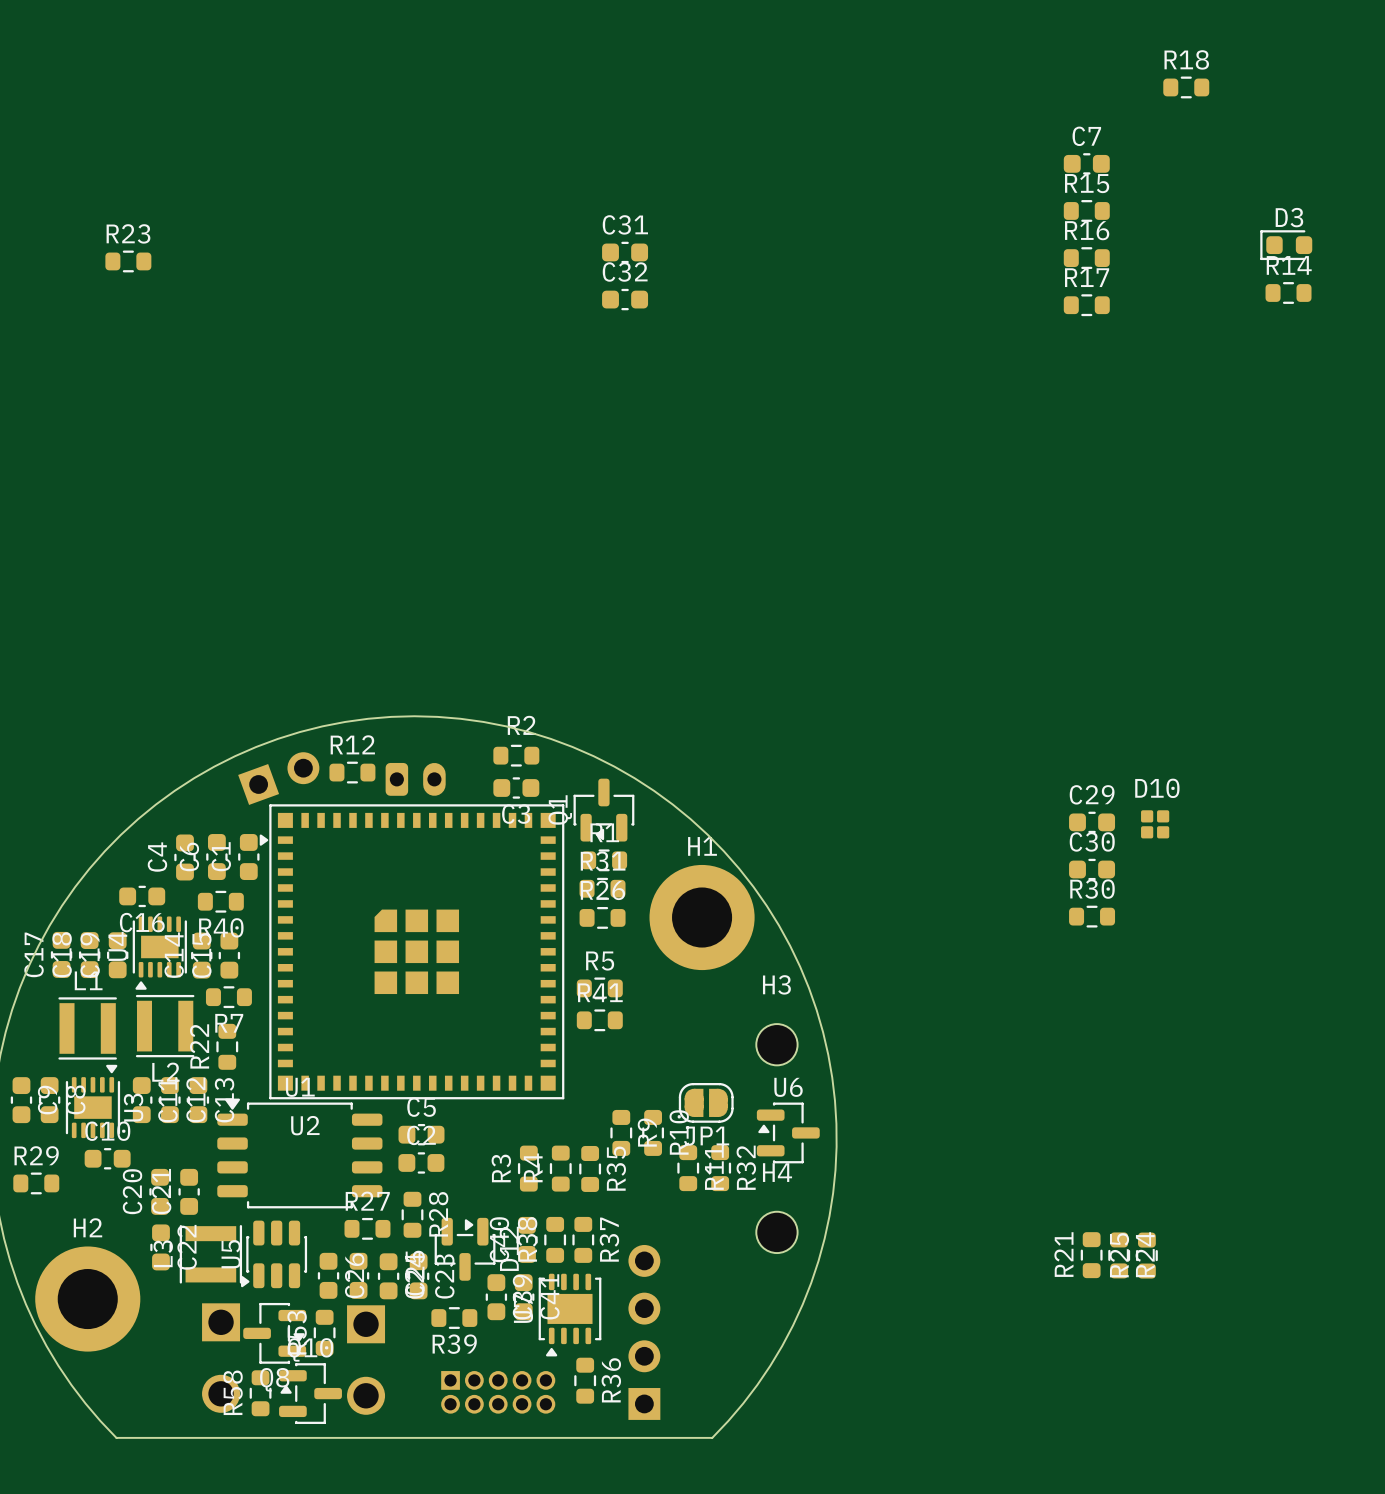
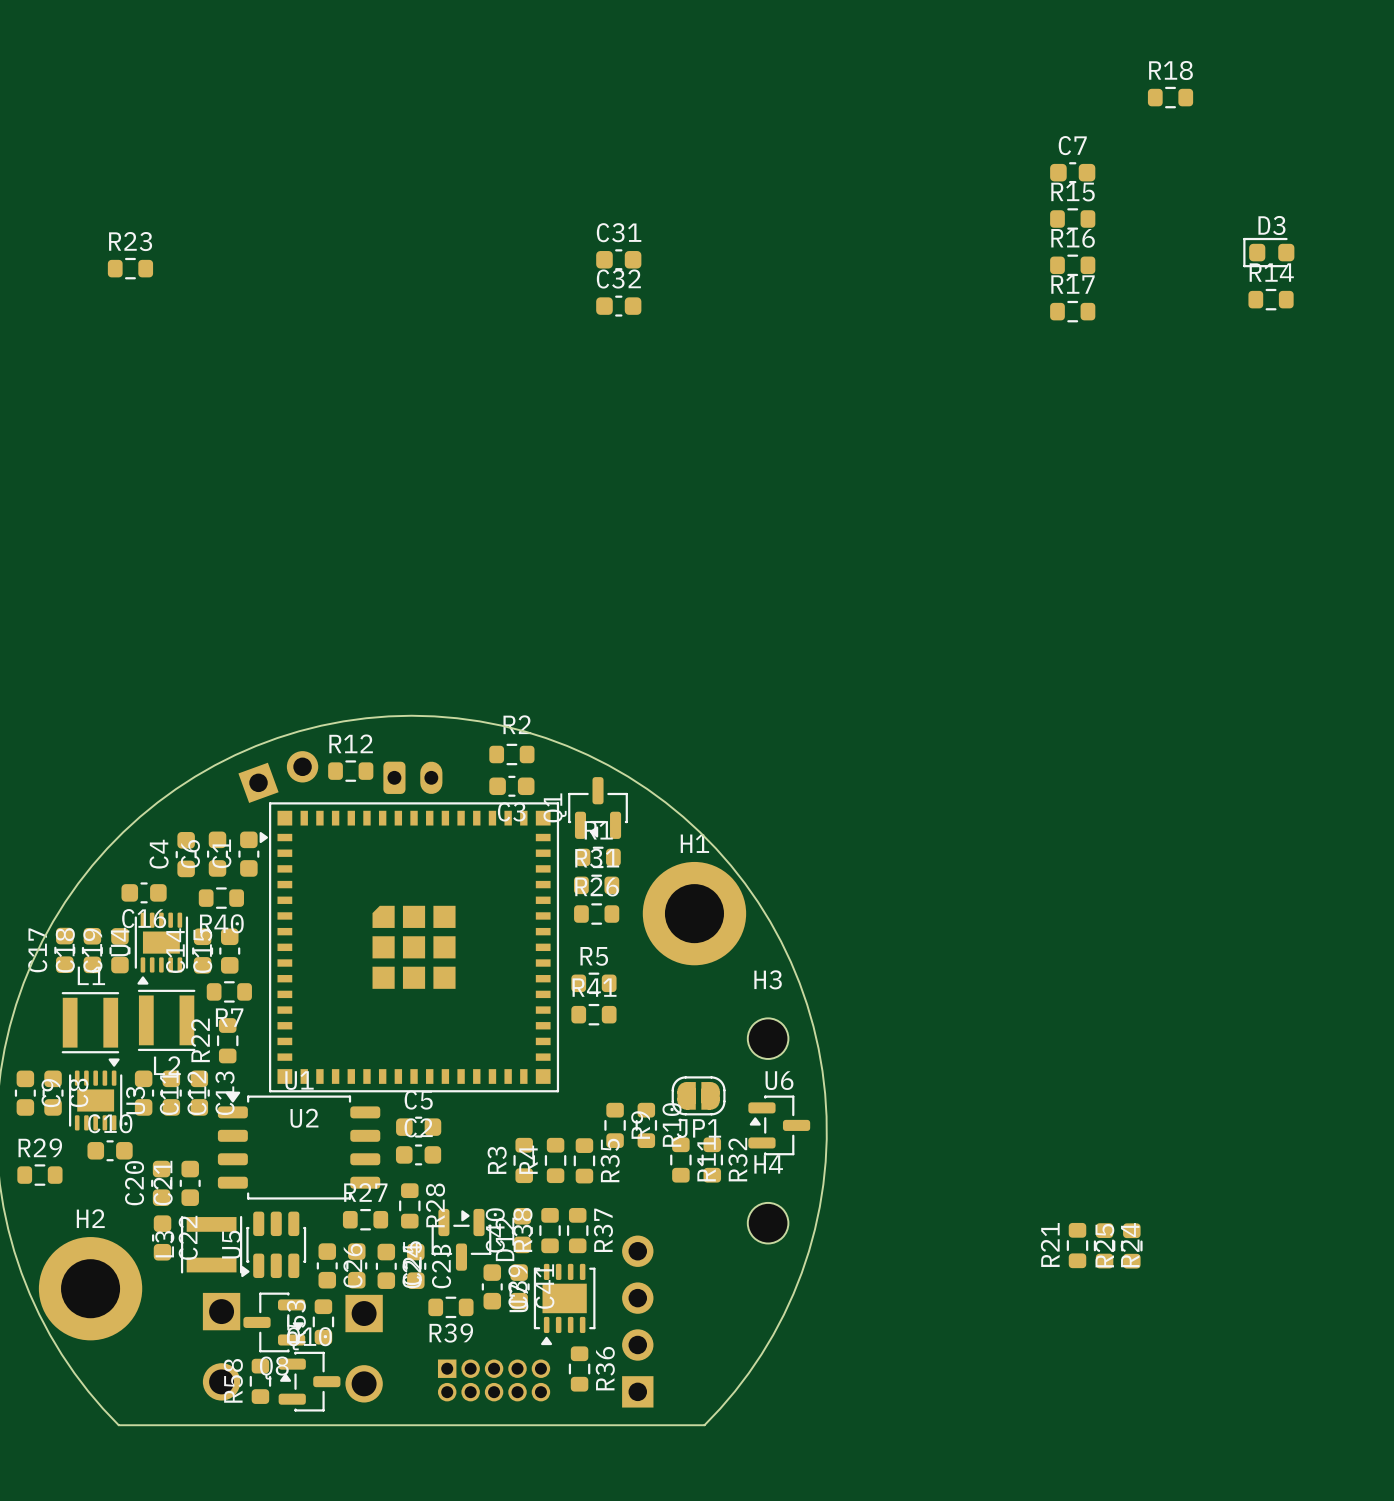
C29: (1092, 822) -> none
D10: (1155, 824) -> none
C30: (1092, 869) -> none
R30: (1092, 916) -> none

